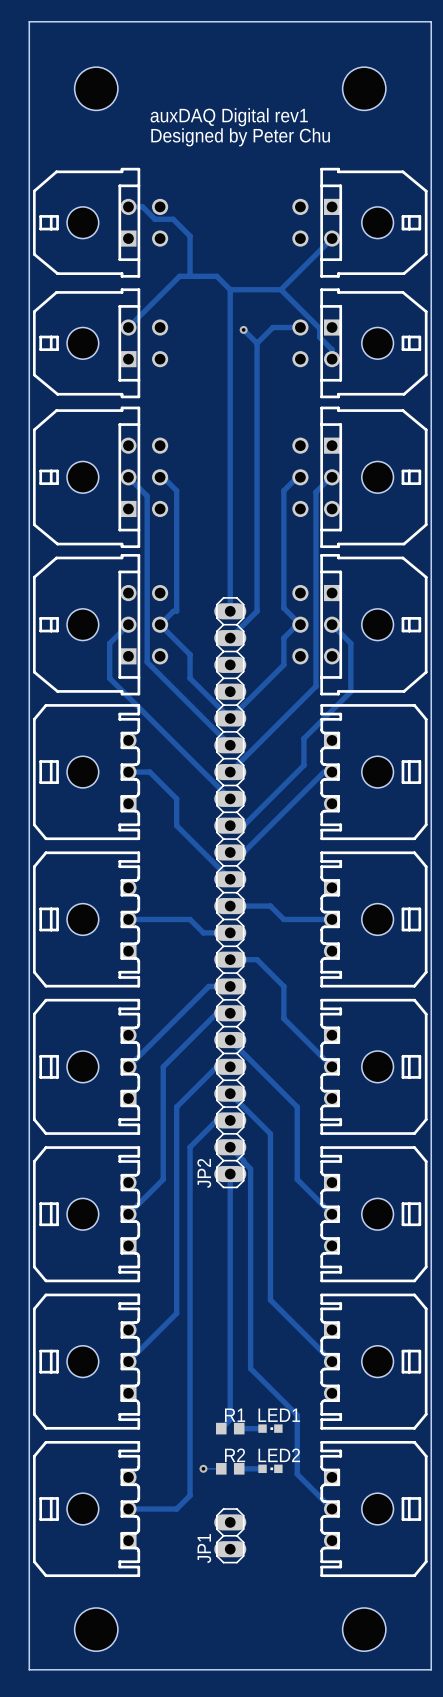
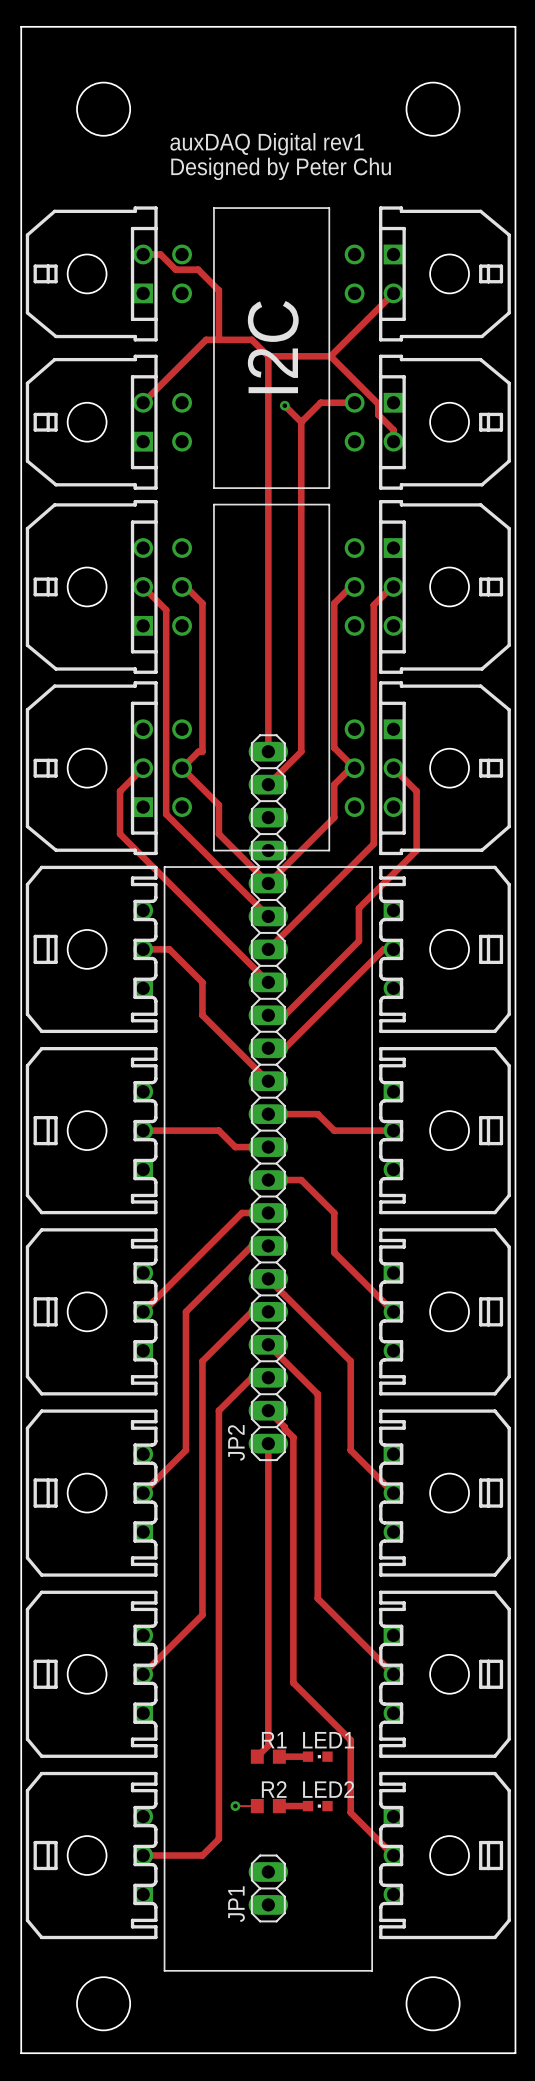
line: none -> (213, 208) (329, 208) (329, 488) (213, 488) (213, 208)
text: none -> I2C (273, 347)
line: none -> (213, 504) (213, 850) (329, 850) (329, 504) (213, 504)
line: none -> (164, 867) (372, 867) (372, 1970) (164, 1970) (164, 867)

